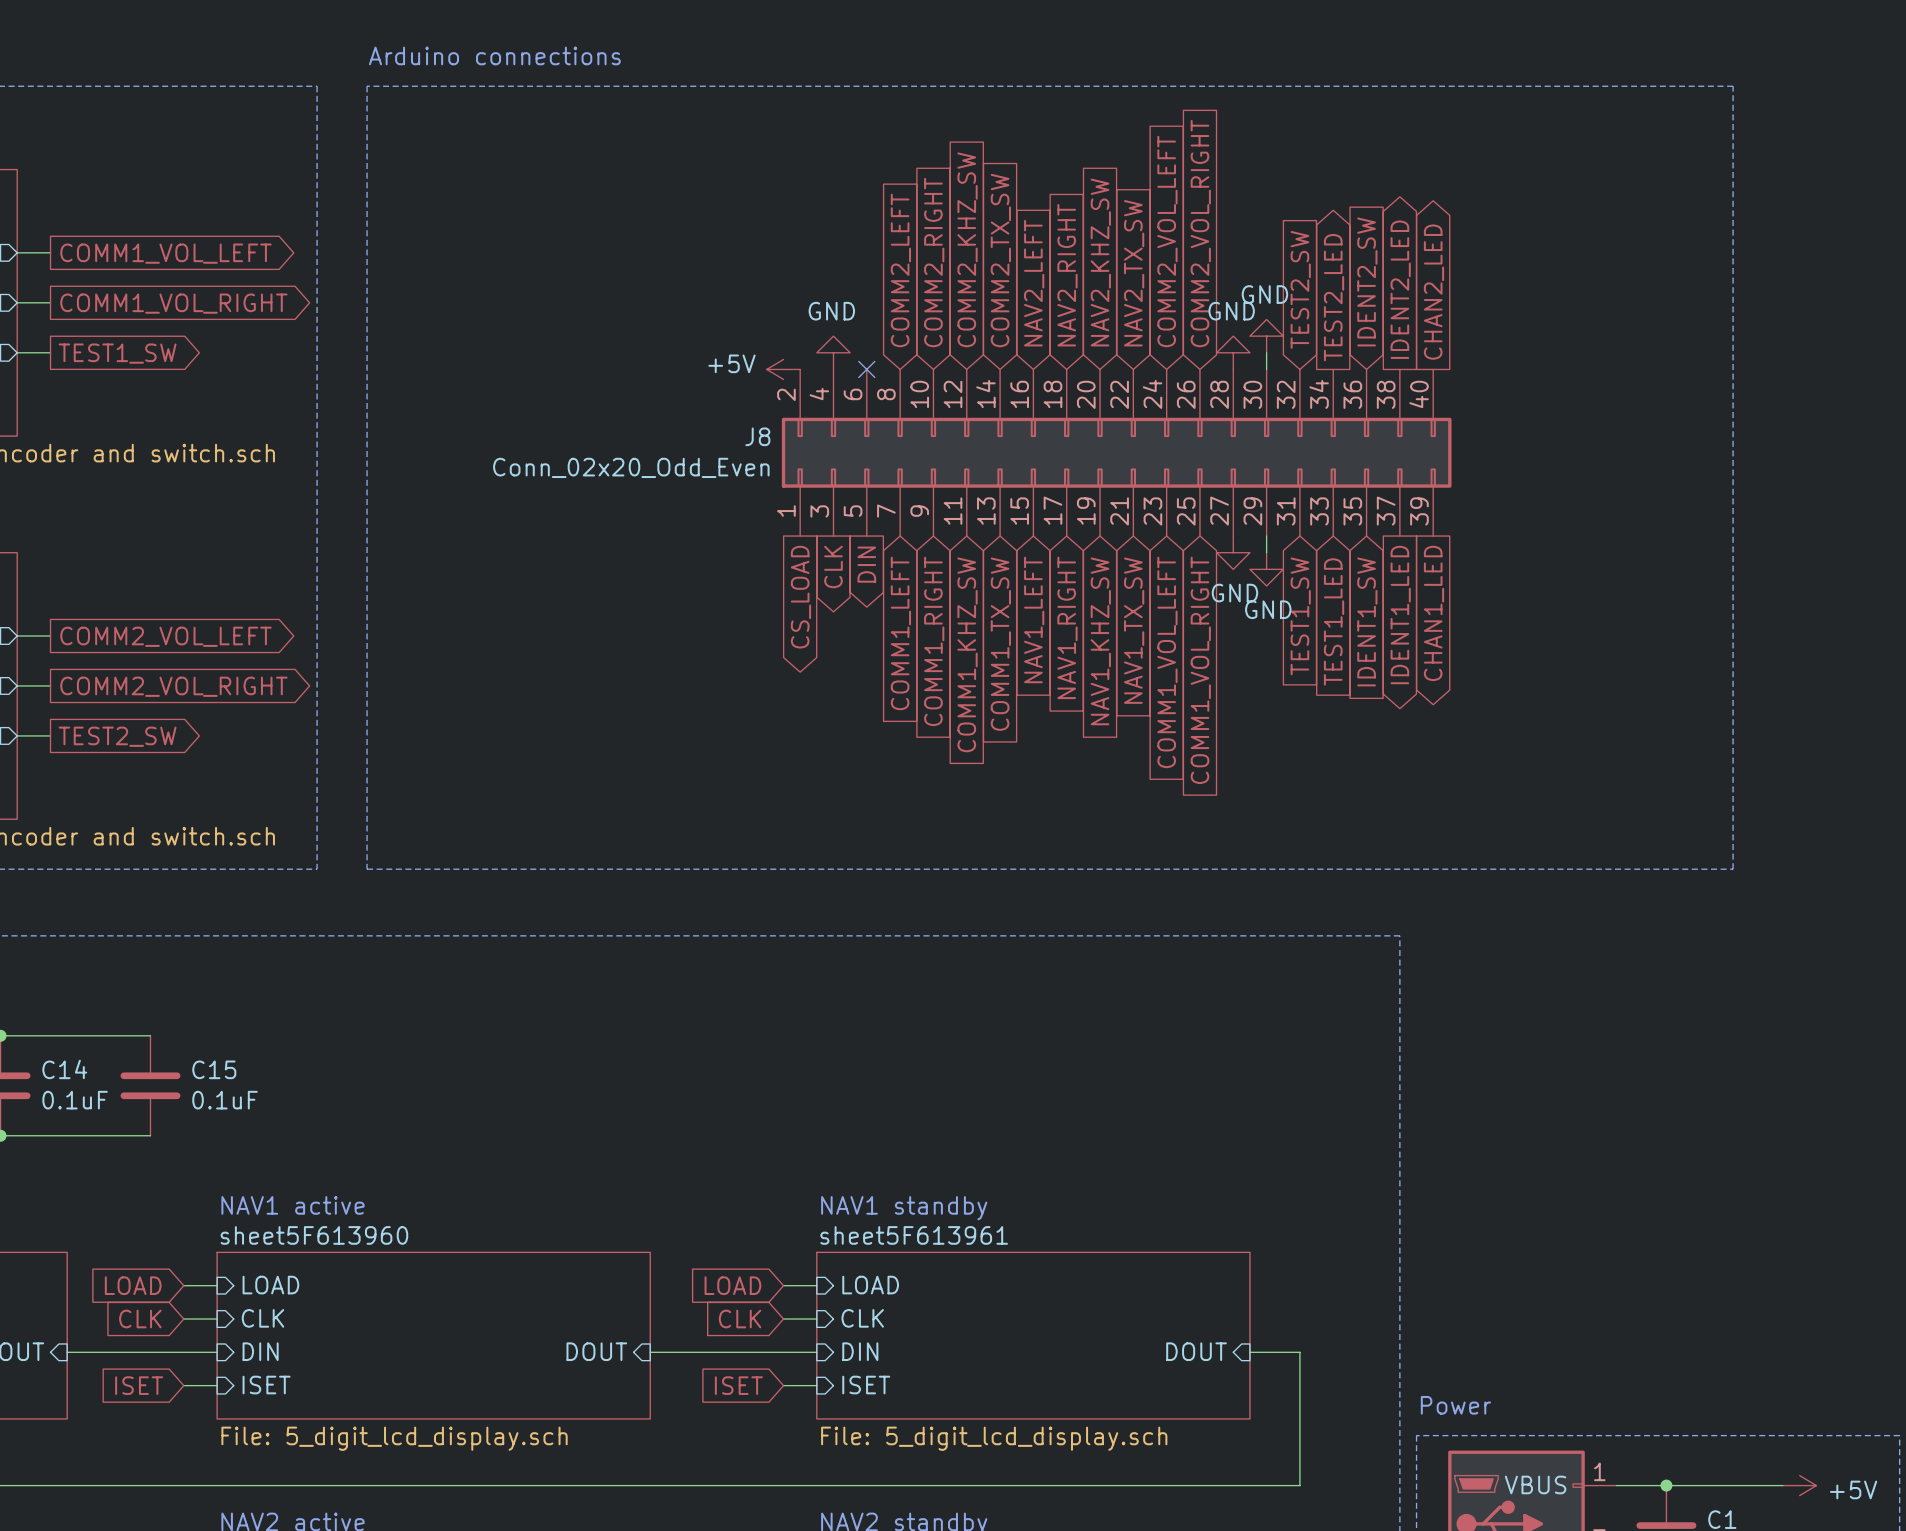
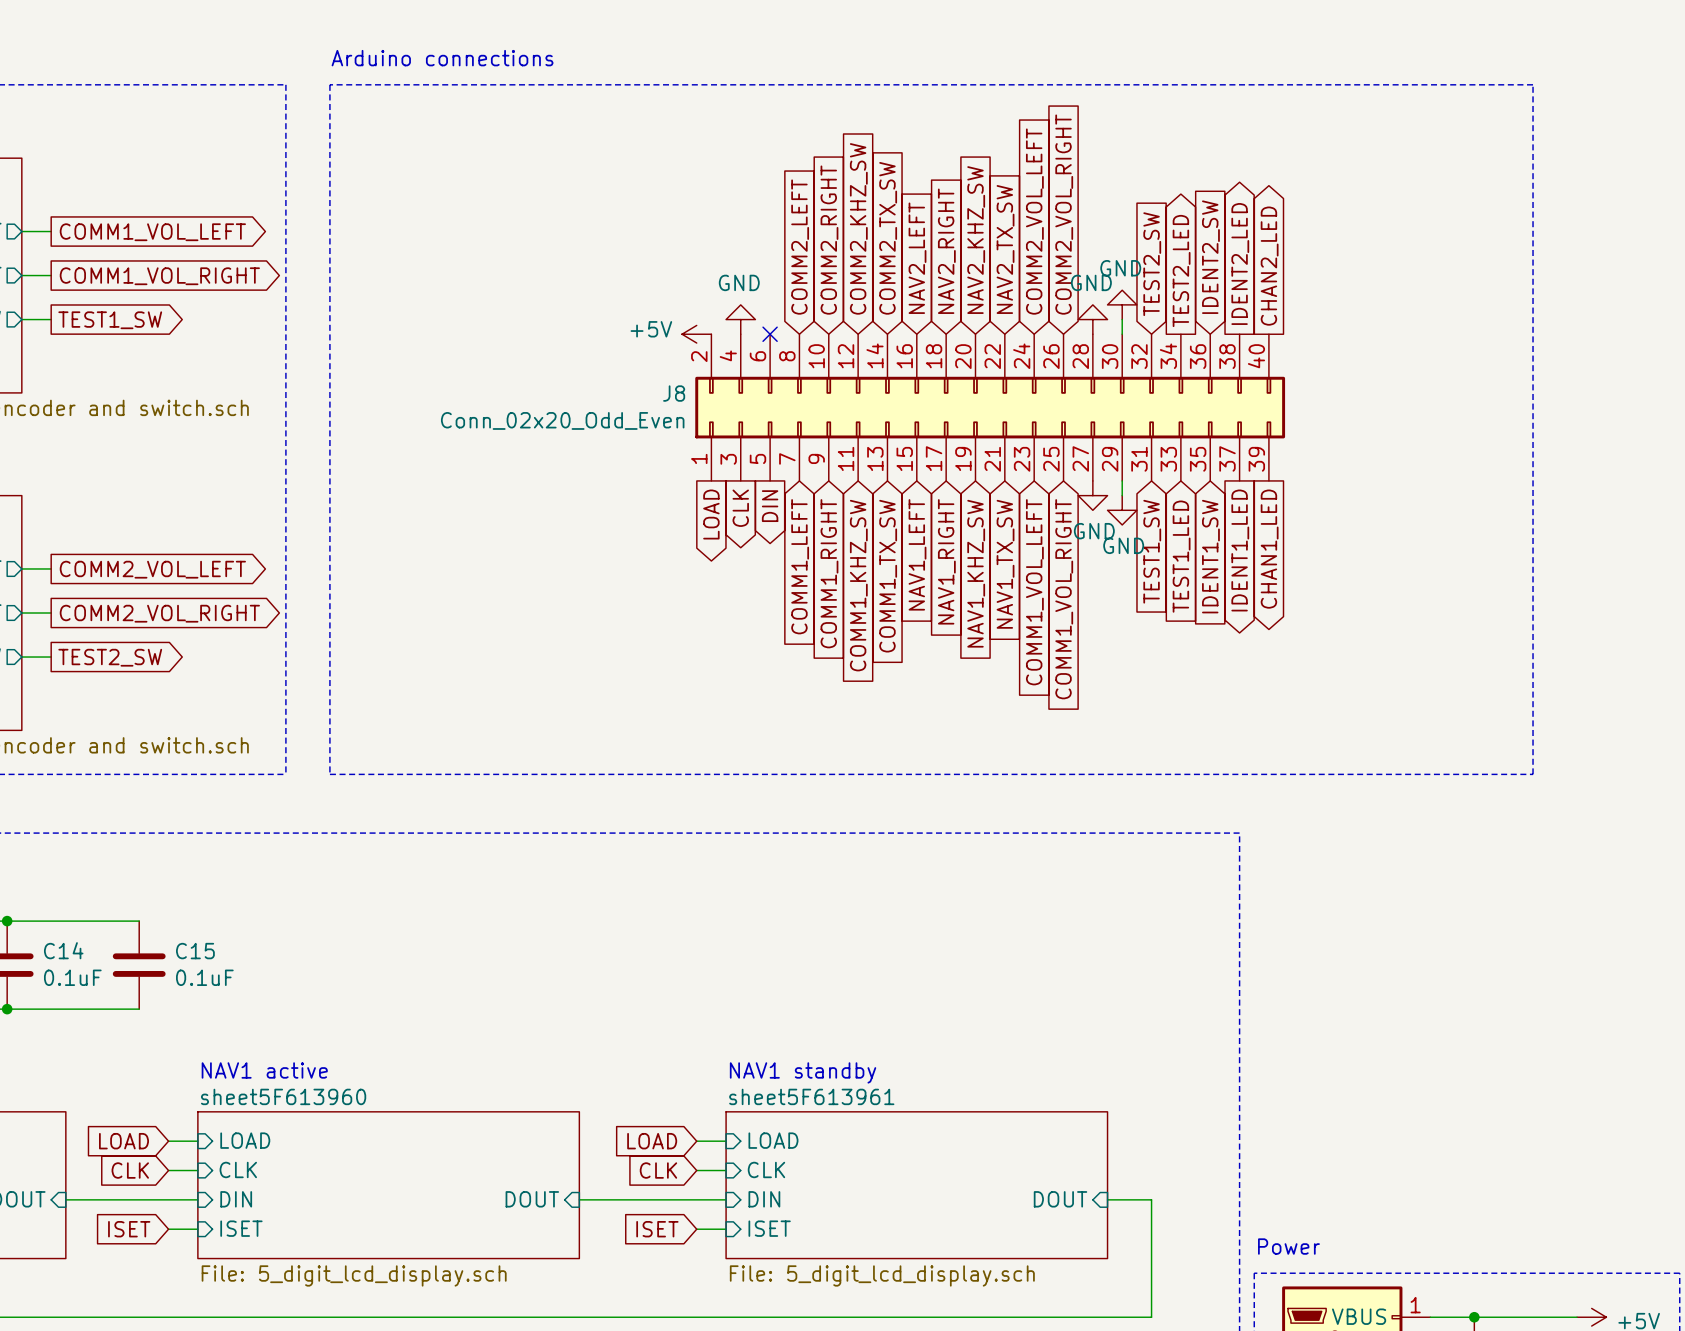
global label: CS_LOAD (800, 597) -> LOAD (711, 514)

